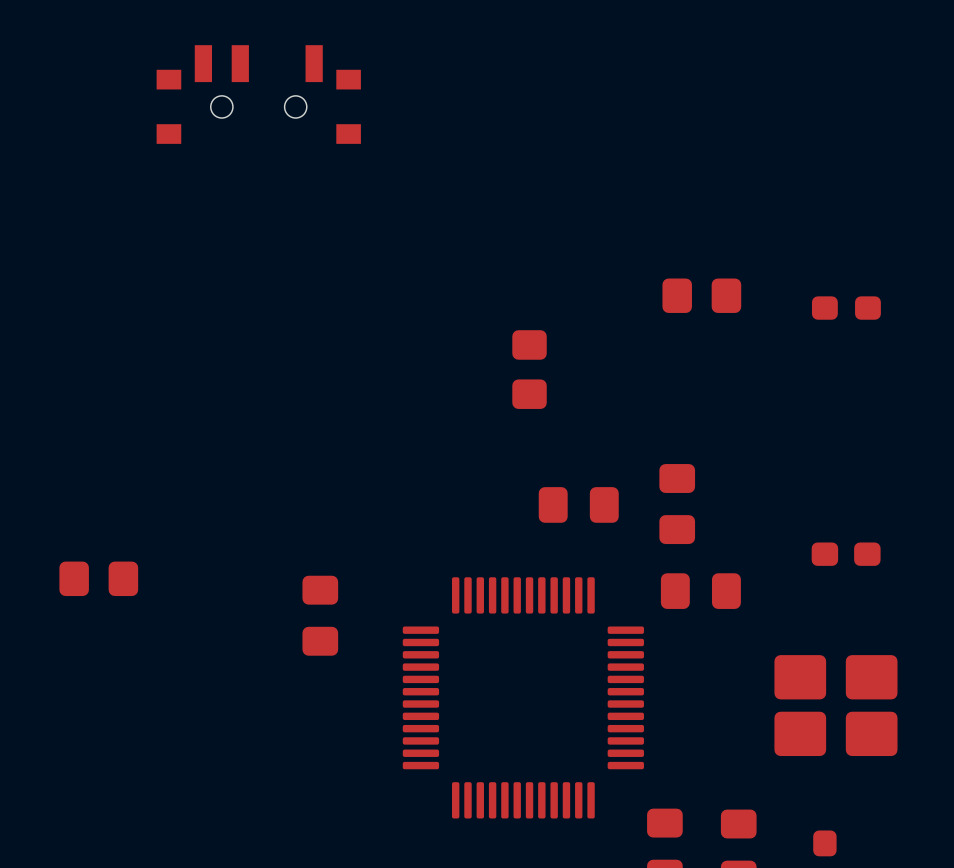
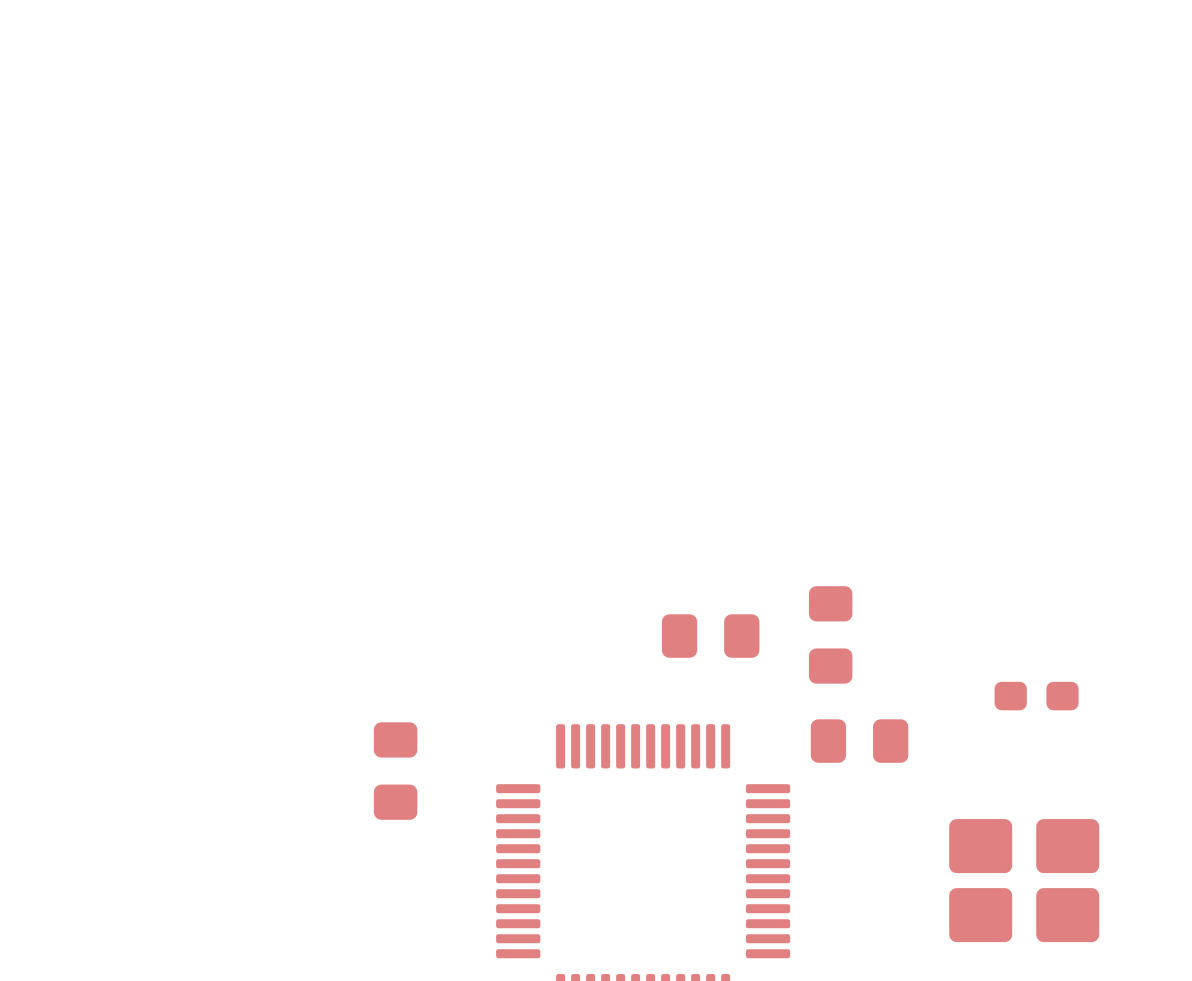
part: (258, 94) -> none
part: (701, 295) -> none
part: (846, 308) -> none
part: (529, 369) -> none
part: (98, 578) -> none

